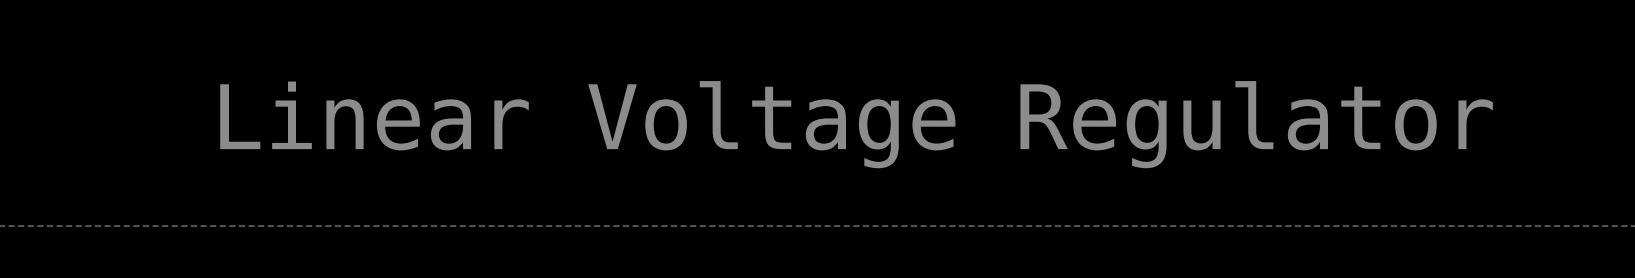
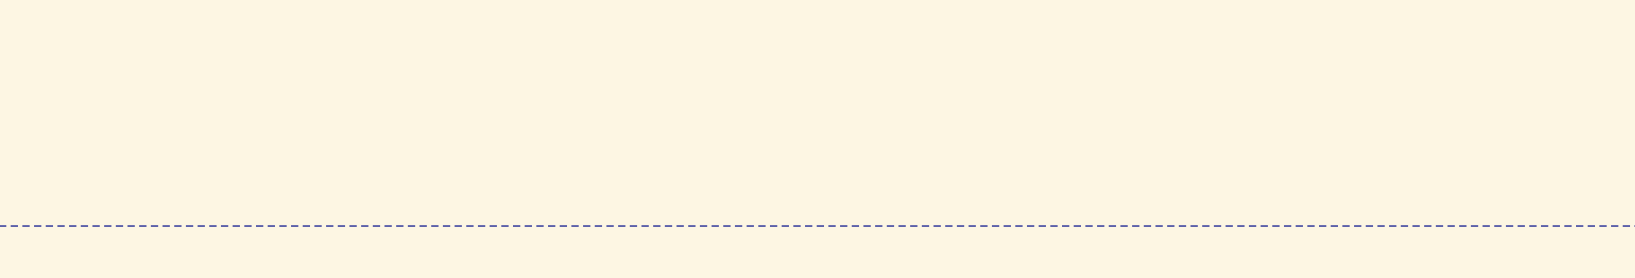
text: Linear Voltage Regulator (856, 124) -> none

